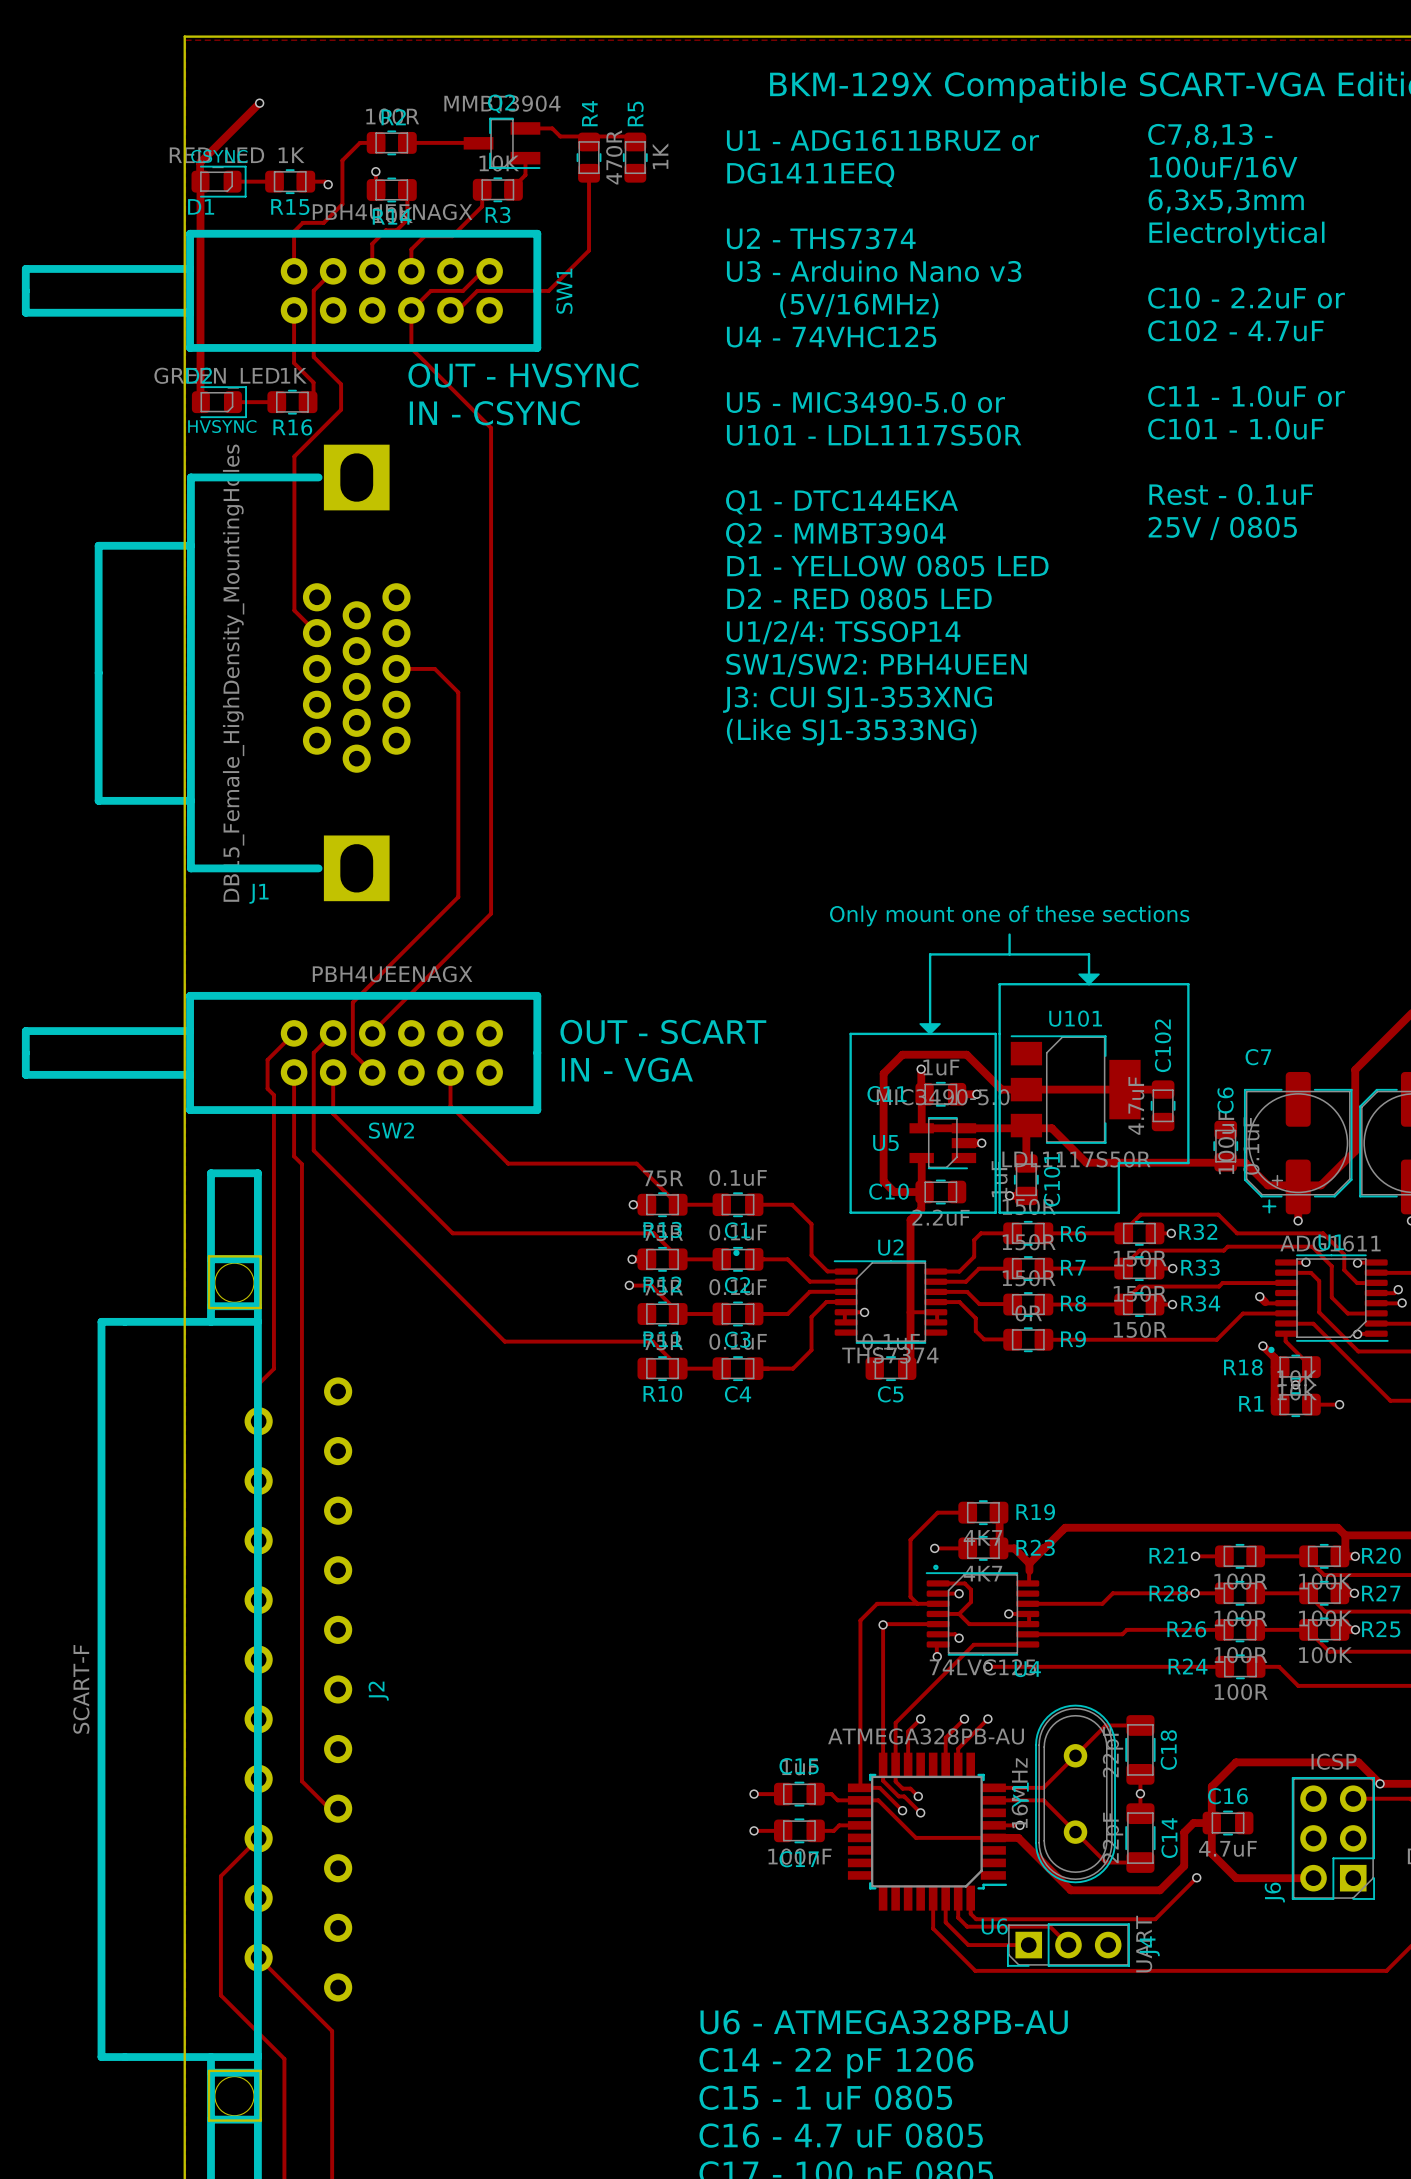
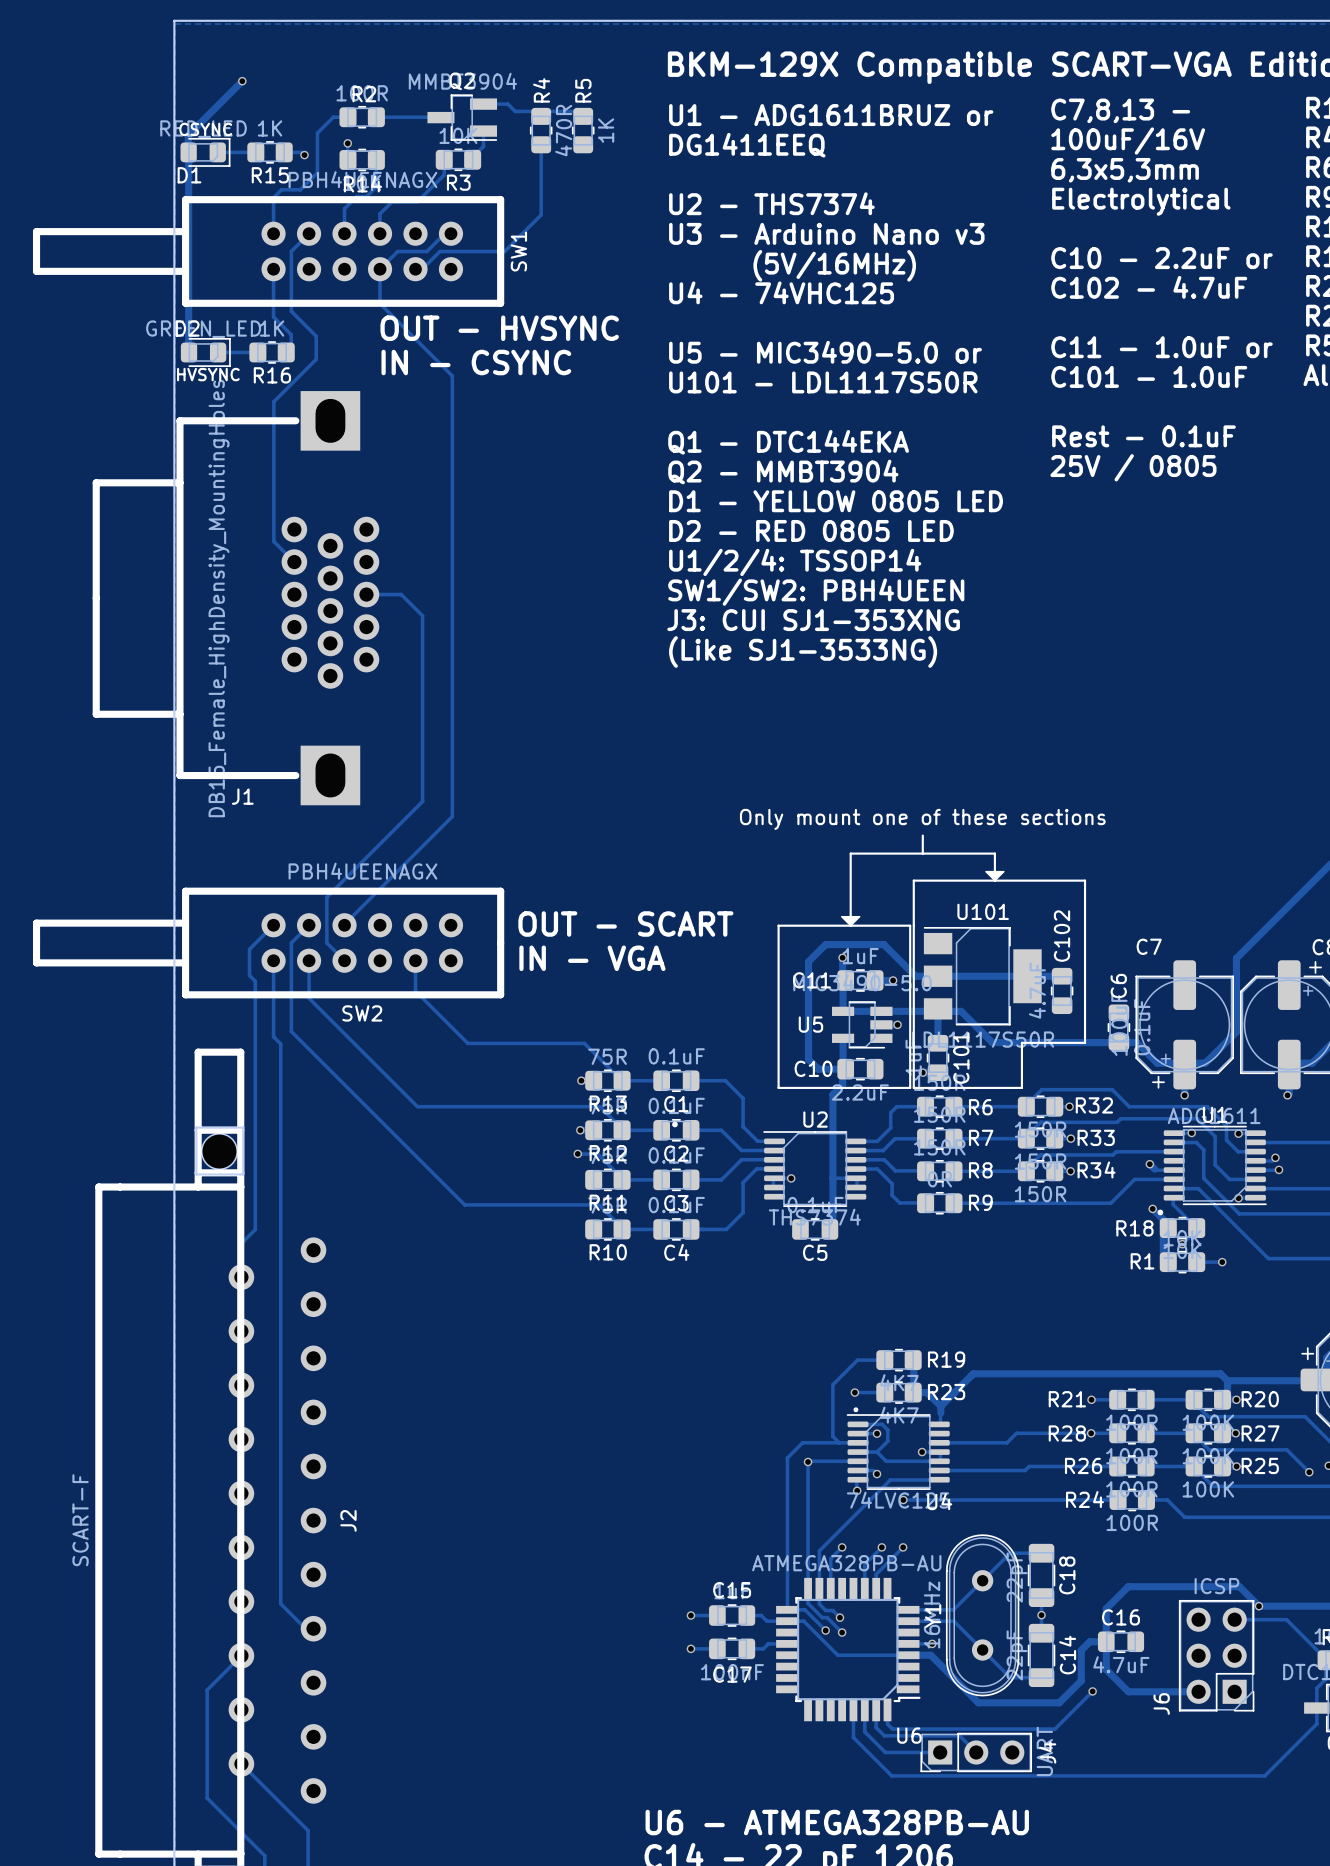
SW1 footprint: [21, 229, 542, 352] -> [32, 196, 505, 307]
SW2 footprint: [21, 991, 542, 1114] -> [32, 887, 505, 999]

